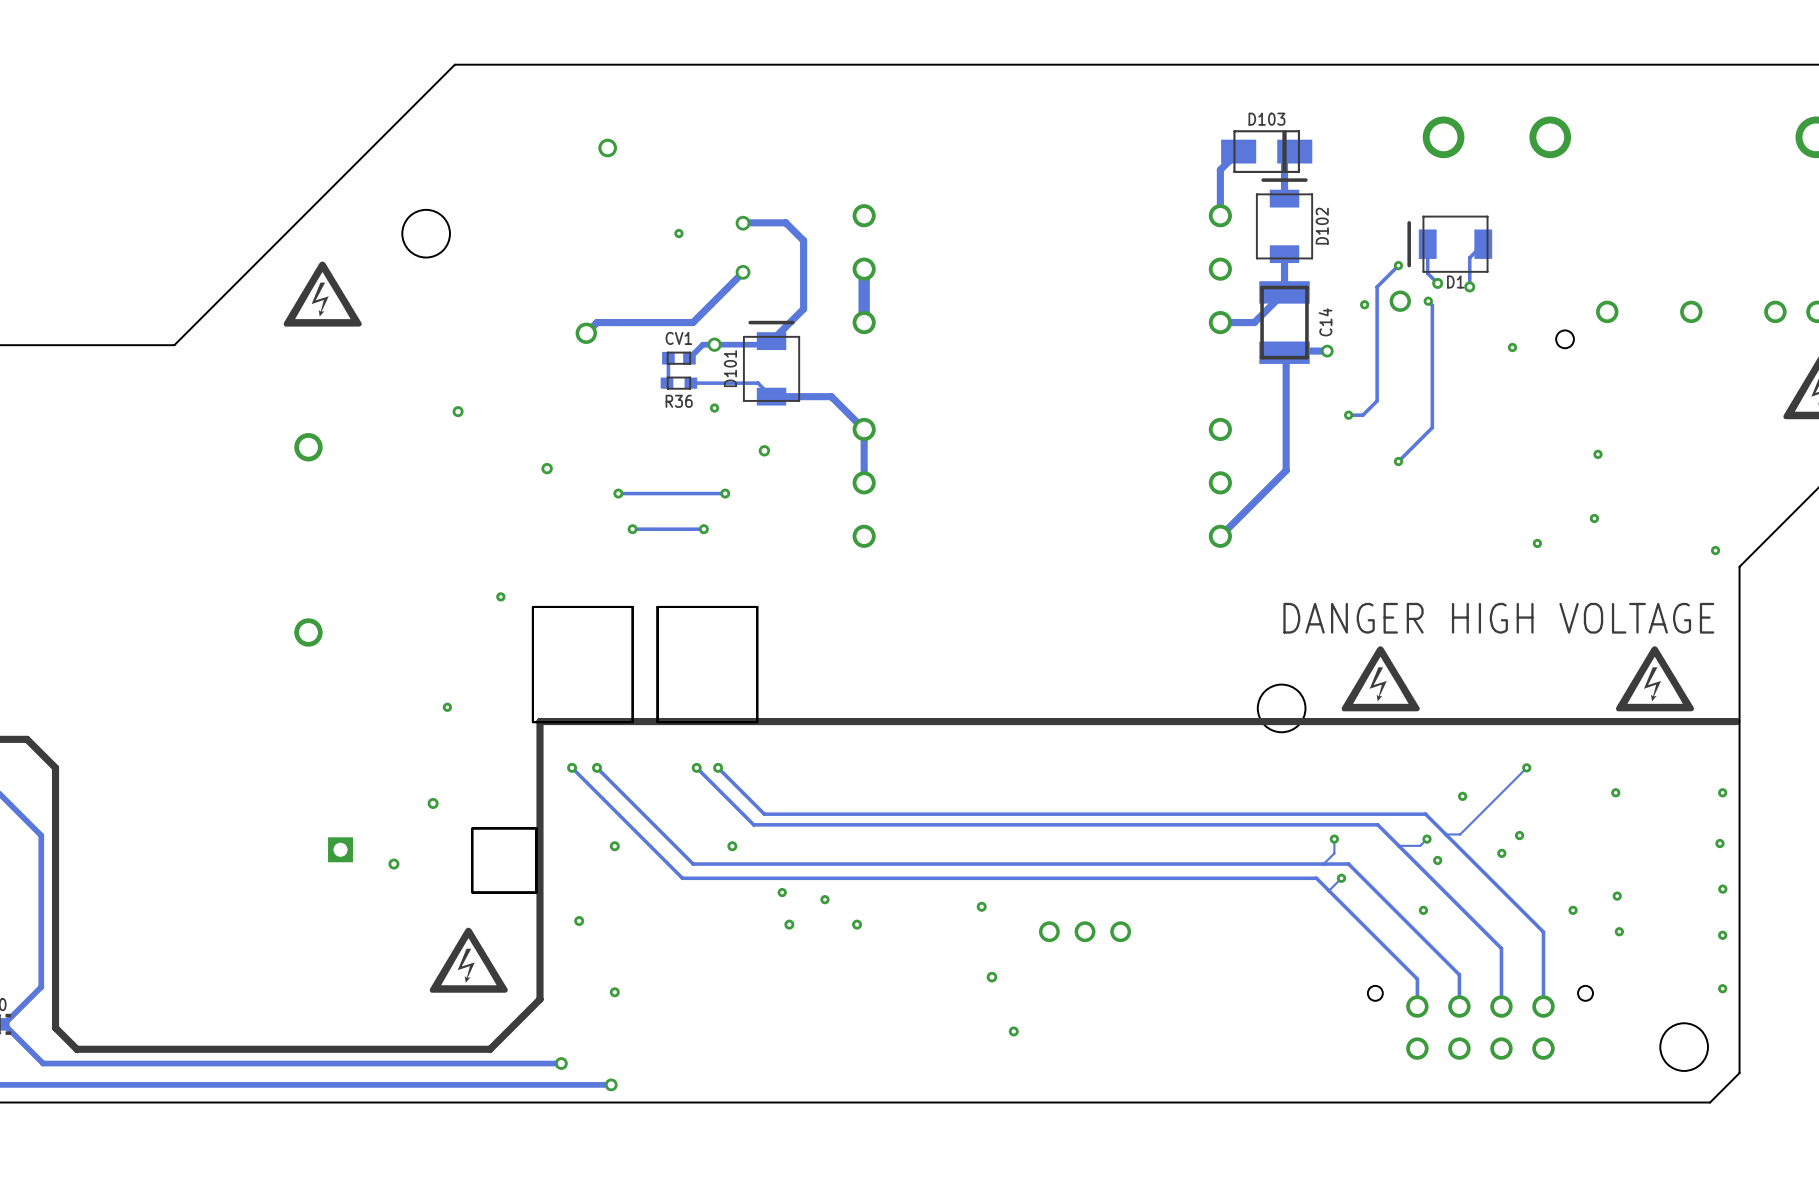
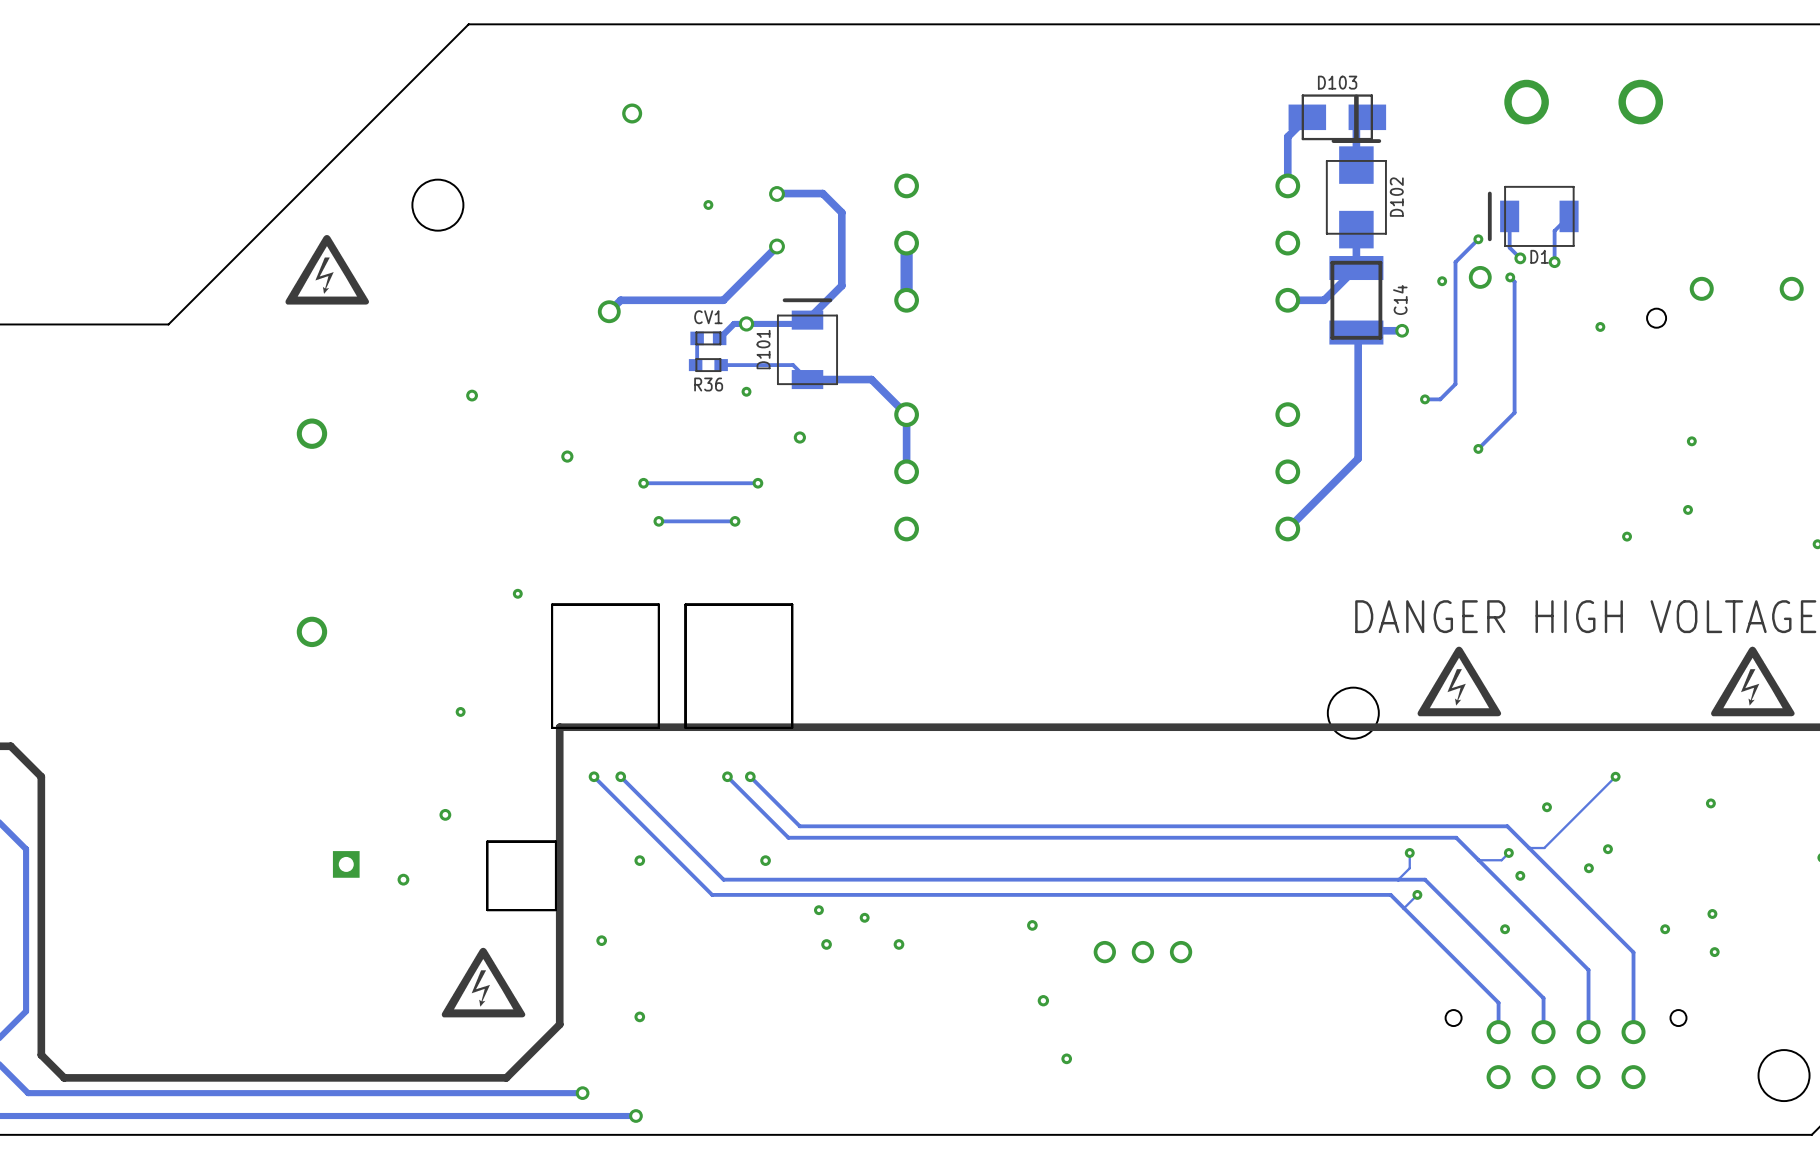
D102 footprint: [1255, 178, 1314, 264] -> [1325, 139, 1387, 249]

